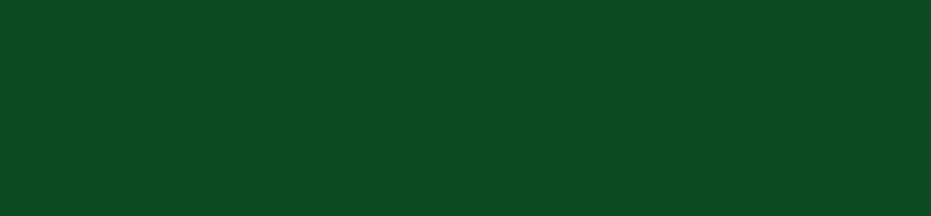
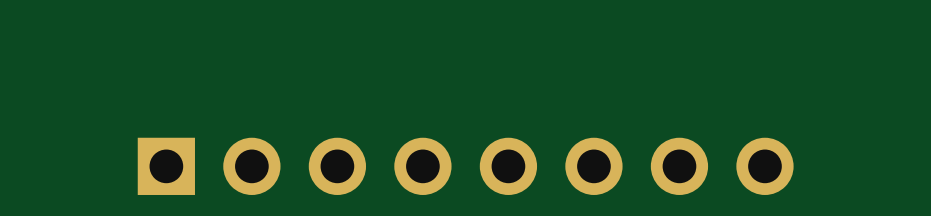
part: none -> (465, 166)

